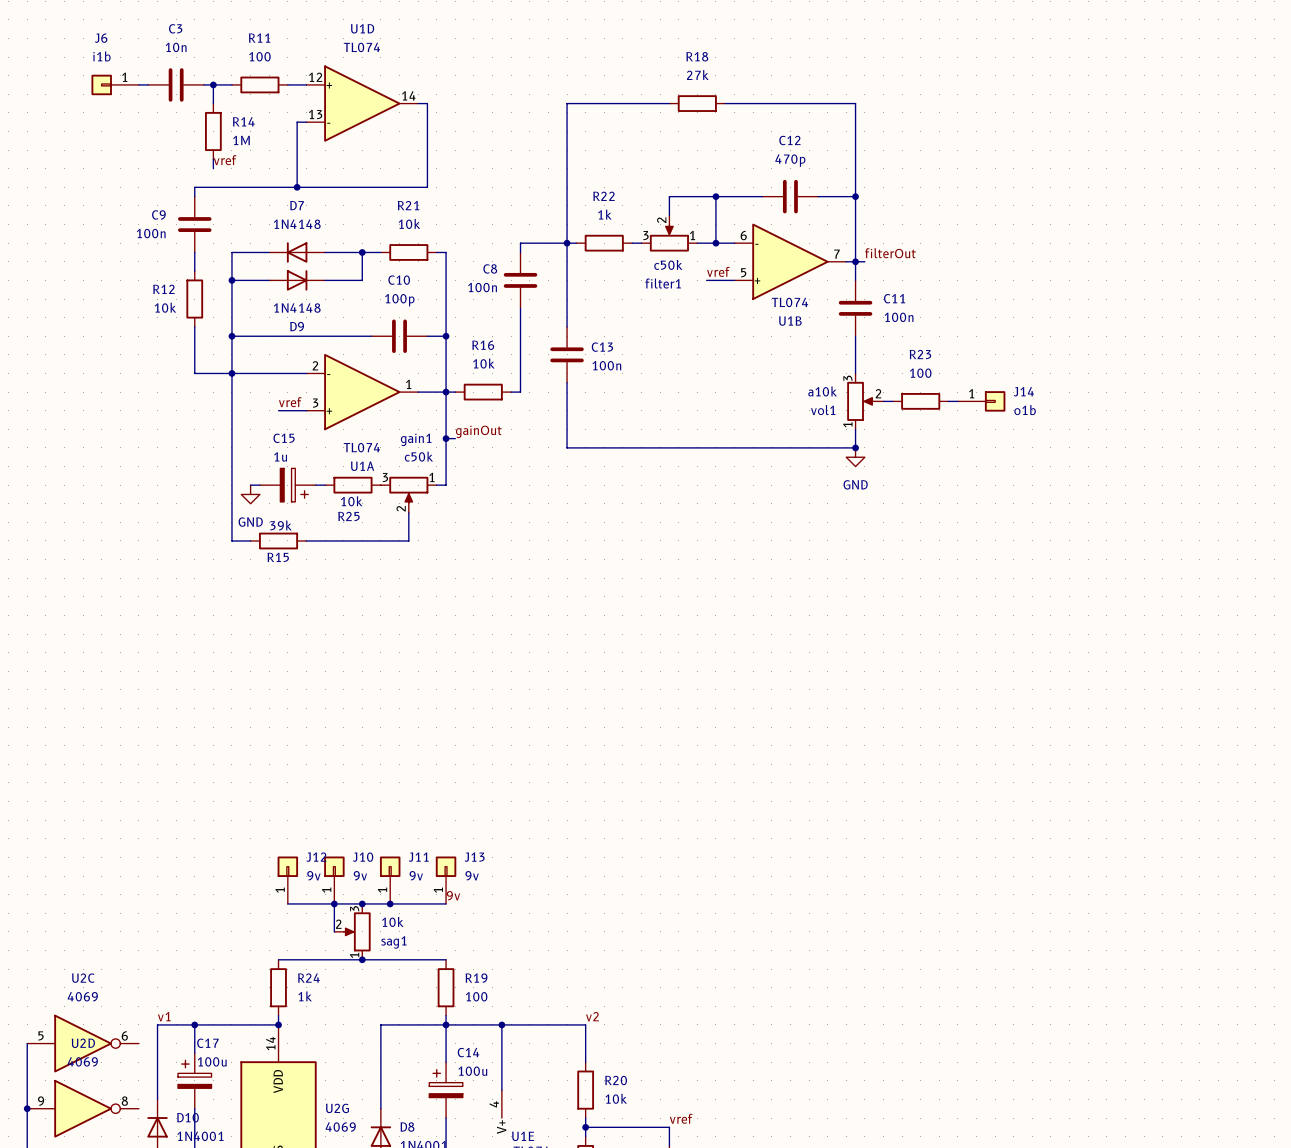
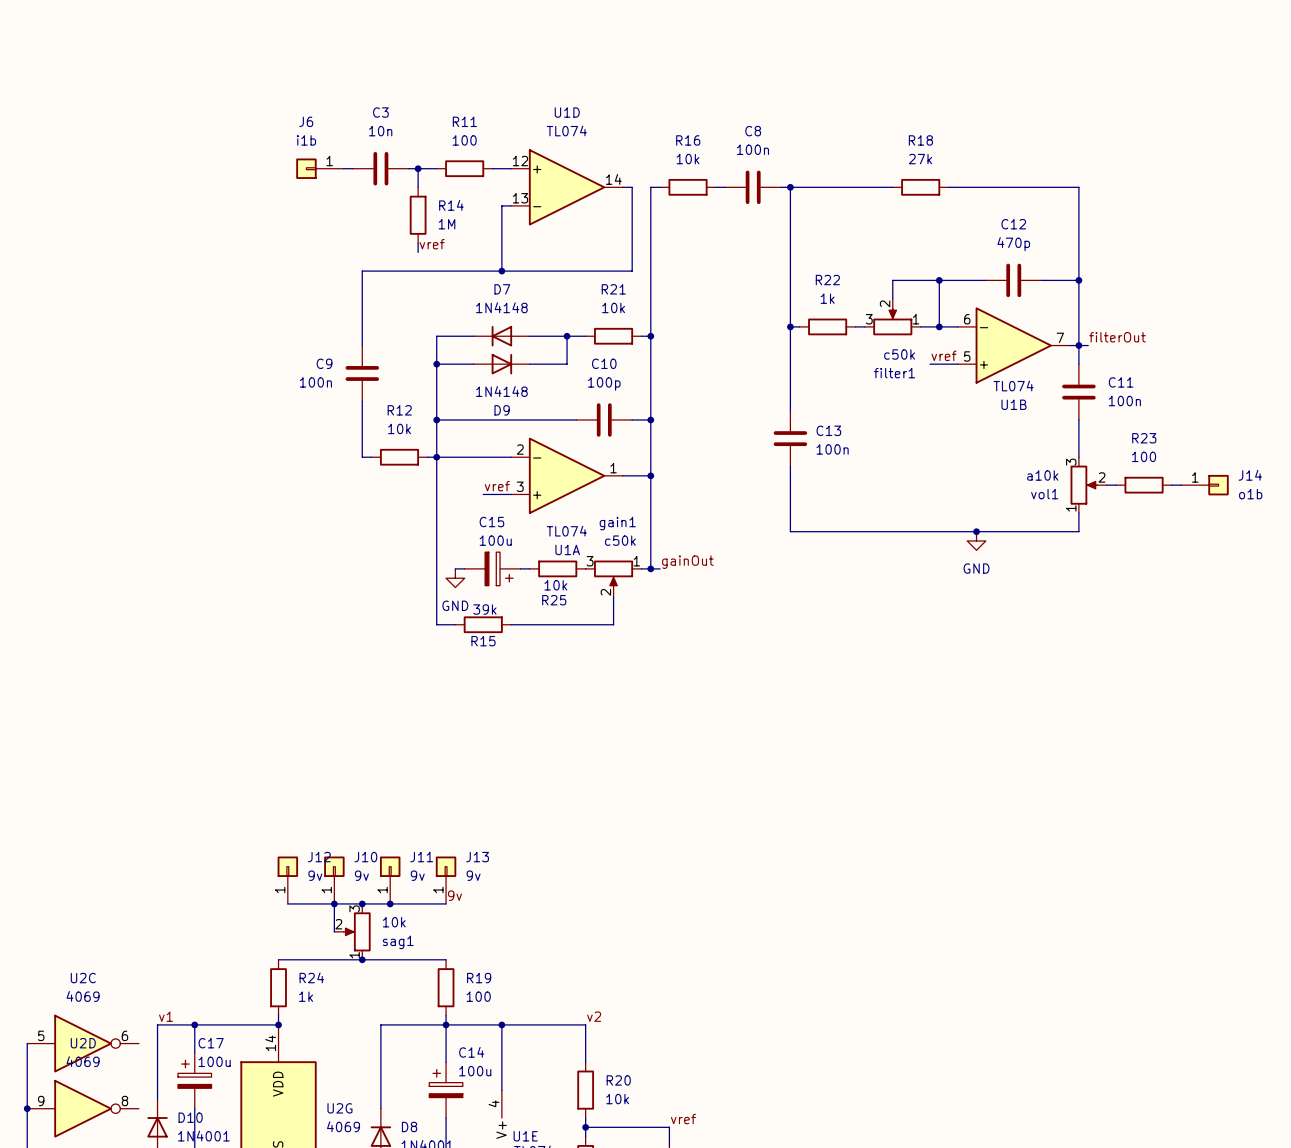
J6 position: (115, 84) -> (319, 168)
wire: (138, 84) (148, 84) -> none
C3 position: (176, 84) -> (380, 168)
wire: (204, 84) (231, 84) -> none
wire: (213, 84) (213, 103) -> none
junction: (213, 84) -> none
R11 position: (259, 84) -> (464, 168)
wire: (287, 84) (306, 84) -> none
U1D position: (362, 103) -> (567, 187)
wire: (418, 103) (427, 103) (427, 187) (194, 187) (194, 196) -> none
wire: (669, 103) (567, 103) (567, 326) -> none
R18 position: (697, 103) -> (920, 187)
wire: (725, 103) (855, 103) (855, 280) -> none
wire: (306, 122) (297, 122) (297, 187) -> none
R14 position: (213, 131) -> (418, 215)
wire: (213, 159) (213, 168) -> none
label: vref (225, 160) -> none
wire: none -> (343, 168) (352, 168)
wire: none -> (408, 168) (436, 168)
wire: none -> (418, 168) (418, 187)
junction: none -> (418, 168)
wire: none -> (492, 168) (511, 168)
junction: (297, 187) -> none
wire: none -> (660, 187) (650, 187) (650, 568)
wire: none -> (715, 187) (725, 187)
wire: none -> (781, 187) (892, 187)
wire: none -> (790, 187) (790, 410)
junction: none -> (790, 187)
wire: none -> (948, 187) (1078, 187) (1078, 364)
wire: (715, 196) (715, 243) -> none
junction: (715, 196) -> none
wire: (762, 196) (669, 196) (669, 215) -> none
C12 position: (790, 196) -> (1013, 280)
wire: (818, 196) (855, 196) -> (920, 326) (957, 326)
junction: (855, 196) -> none
wire: none -> (511, 205) (501, 205) (501, 271)
C9 position: (194, 224) -> (362, 373)
filter1 position: (669, 233) -> (892, 317)
wire: none -> (418, 243) (418, 252)
label: none -> vref (432, 244)
junction: (567, 243) -> none
wire: (576, 243) (520, 243) (520, 252) -> none
R22 position: (604, 243) -> (827, 326)
wire: (632, 243) (641, 243) -> (641, 336) (650, 336)
wire: (697, 243) (734, 243) -> none
junction: (715, 243) -> none
wire: (194, 252) (194, 271) -> none
wire: (269, 252) (231, 252) (231, 540) (250, 540) -> none
D7 position: (297, 252) -> (501, 336)
wire: (325, 252) (380, 252) -> none
wire: (362, 252) (362, 271) -> (622, 187) (632, 187) (632, 271) (362, 271)
junction: (362, 252) -> none
R21 position: (408, 252) -> (613, 336)
wire: (436, 252) (446, 252) (446, 485) (436, 485) -> none
label: filterOut (890, 253) -> none
U1B position: (790, 261) -> (1013, 345)
wire: (846, 261) (864, 261) -> none
junction: (855, 261) -> none
filter1 value position: c50k (668, 264) -> c50k (899, 354)
C8 name position: C8 (490, 268) -> C8 (753, 131)
junction: none -> (501, 271)
label: vref (718, 271) -> none
wire: (231, 280) (269, 280) -> none
junction: (231, 280) -> none
D9 position: (297, 280) -> (501, 364)
wire: (325, 280) (362, 280) -> (362, 345) (362, 280)
C8 rotation: 0° (520, 280) -> 90° clockwise (753, 187)
C8 position: (520, 280) -> (753, 187)
wire: (706, 280) (734, 280) -> none
wire: none -> (939, 280) (939, 326)
junction: none -> (939, 280)
wire: none -> (985, 280) (892, 280) (892, 299)
wire: none -> (1041, 280) (1078, 280)
junction: none -> (1078, 280)
filter1 name position: filter1 (663, 283) -> filter1 (894, 373)
R12 name position: R12 (163, 289) -> R12 (399, 410)
R12 rotation: 0° (194, 299) -> 90° clockwise (399, 457)
R12 position: (194, 299) -> (399, 457)
wire: (520, 308) (520, 392) (511, 392) -> none
C11 position: (855, 308) -> (1078, 392)
wire: (194, 326) (194, 373) (306, 373) -> none
junction: none -> (790, 326)
junction: none -> (939, 326)
wire: (231, 336) (371, 336) -> none
junction: (231, 336) -> none
C10 position: (399, 336) -> (604, 420)
wire: (427, 336) (436, 336) -> (455, 624) (436, 624) (436, 336)
wire: none -> (446, 336) (473, 336)
junction: (446, 336) -> none
wire: none -> (529, 336) (585, 336)
wire: none -> (567, 336) (567, 364) (529, 364)
junction: none -> (567, 336)
junction: none -> (650, 336)
wire: (855, 336) (855, 373) -> none
label: none -> filterOut (1117, 337)
wire: none -> (1069, 345) (1088, 345)
junction: none -> (1078, 345)
C13 position: (567, 354) -> (790, 438)
label: none -> vref (944, 355)
junction: none -> (436, 364)
wire: none -> (930, 364) (957, 364)
junction: (231, 373) -> none
wire: (567, 382) (567, 447) (855, 447) (855, 429) -> none
U1A position: (362, 392) -> (567, 475)
wire: (418, 392) (455, 392) -> (436, 364) (473, 364)
junction: (446, 392) -> none
R16 position: (483, 392) -> (688, 187)
wire: none -> (362, 401) (362, 457) (371, 457)
vol1 position: (865, 401) -> (1088, 485)
wire: (883, 401) (892, 401) -> (790, 326) (799, 326)
R23 position: (920, 401) -> (1144, 485)
wire: (948, 401) (957, 401) -> (855, 326) (864, 326)
J14 position: (981, 401) -> (1205, 485)
label: vref (290, 402) -> none
wire: (278, 410) (306, 410) -> none
wire: none -> (436, 420) (576, 420)
junction: none -> (436, 420)
wire: none -> (632, 420) (650, 420)
junction: none -> (650, 420)
wire: none -> (1078, 420) (1078, 457)
label: gainOut (478, 431) -> none
wire: (446, 438) (455, 438) -> (455, 568) (464, 568)
junction: (446, 438) -> none
junction: (855, 447) -> none
C15 value: 1u (280, 456) -> 100u (495, 540)
wire: none -> (427, 457) (511, 457)
junction: none -> (436, 457)
power symbol position: GND (855, 457) -> GND (976, 540)
wire: none -> (790, 466) (790, 531) (1078, 531) (1078, 513)
wire: none -> (622, 475) (650, 475)
junction: none -> (650, 475)
wire: (250, 485) (259, 485) -> none
C15 position: (287, 485) -> (492, 568)
wire: (315, 485) (325, 485) -> none
R25 position: (352, 485) -> (557, 568)
label: none -> vref (497, 486)
wire: none -> (1106, 485) (1116, 485)
wire: none -> (1171, 485) (1181, 485)
power symbol: GND (250, 494) -> none
gain1 position: (408, 494) -> (613, 578)
wire: none -> (483, 494) (511, 494)
wire: (408, 513) (408, 540) (306, 540) -> none
junction: none -> (976, 531)
R15 position: (278, 540) -> (483, 624)
label: none -> gainOut (687, 562)
wire: none -> (520, 568) (529, 568)
wire: none -> (641, 568) (660, 568)
junction: none -> (650, 568)
power symbol: none -> GND (455, 578)
wire: none -> (613, 596) (613, 624) (511, 624)

